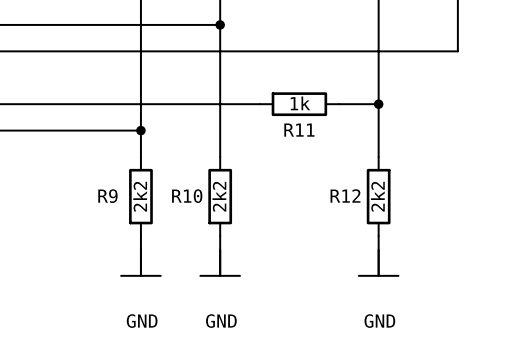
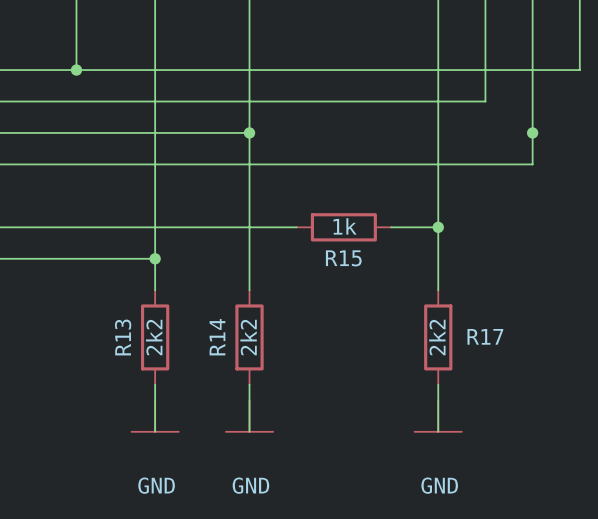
junction: none -> (532, 132)
R11 name: R11 (299, 130) -> R15 (343, 258)
R9 name: R9 (107, 196) -> R13 (123, 337)
R10 name: R10 (187, 196) -> R14 (217, 337)
R12 name: R12 (345, 196) -> R17 (485, 336)

